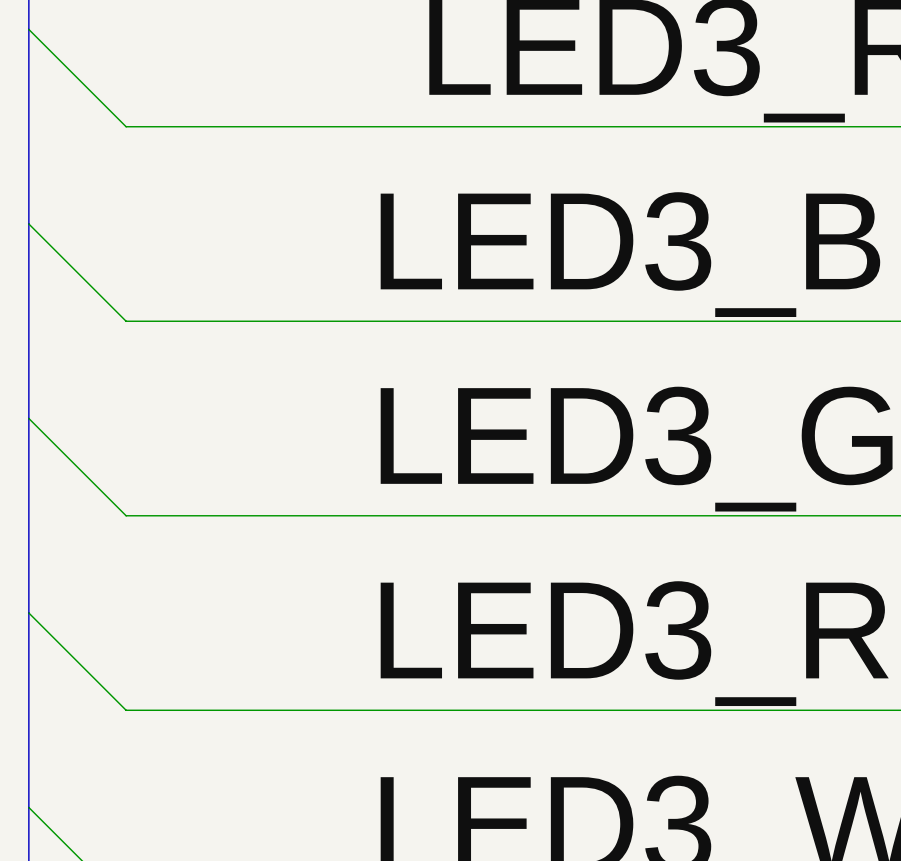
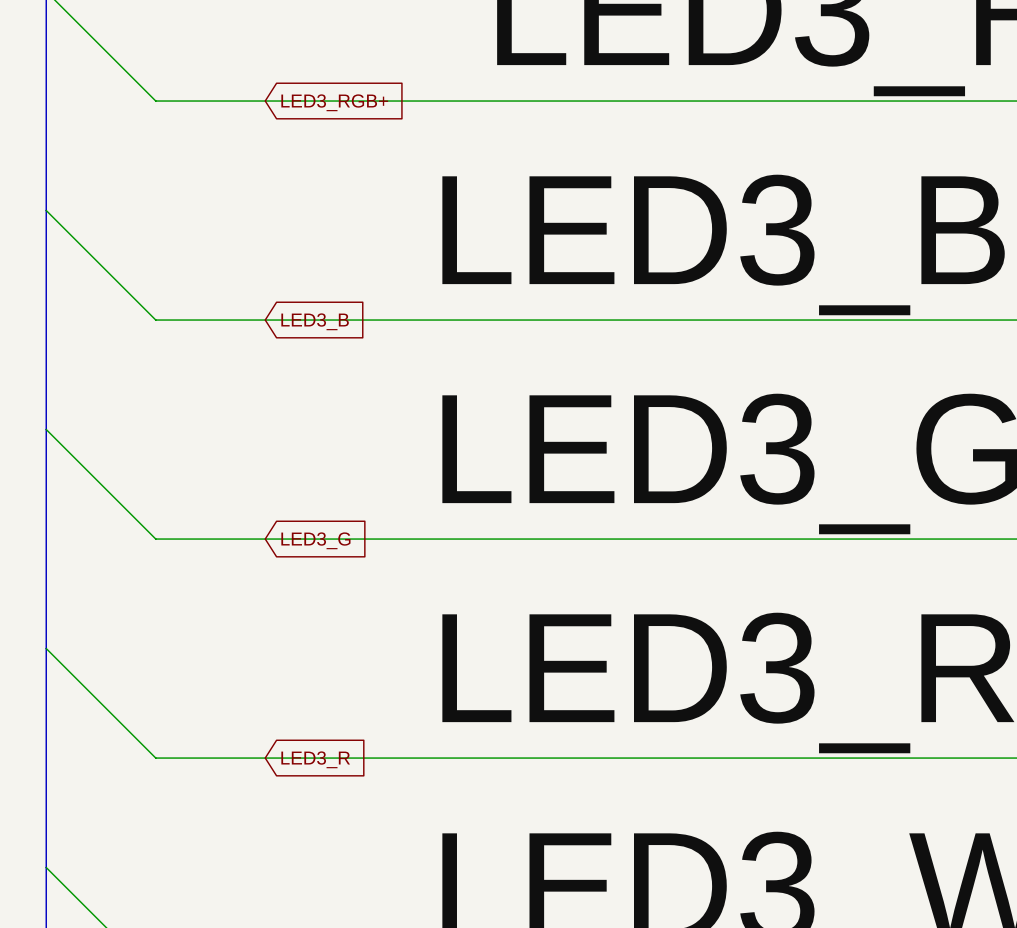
global label: none -> LED3_RGB+ (334, 102)
global label: none -> LED3_B (315, 321)
global label: none -> LED3_G (315, 540)
global label: none -> LED3_R (315, 759)

